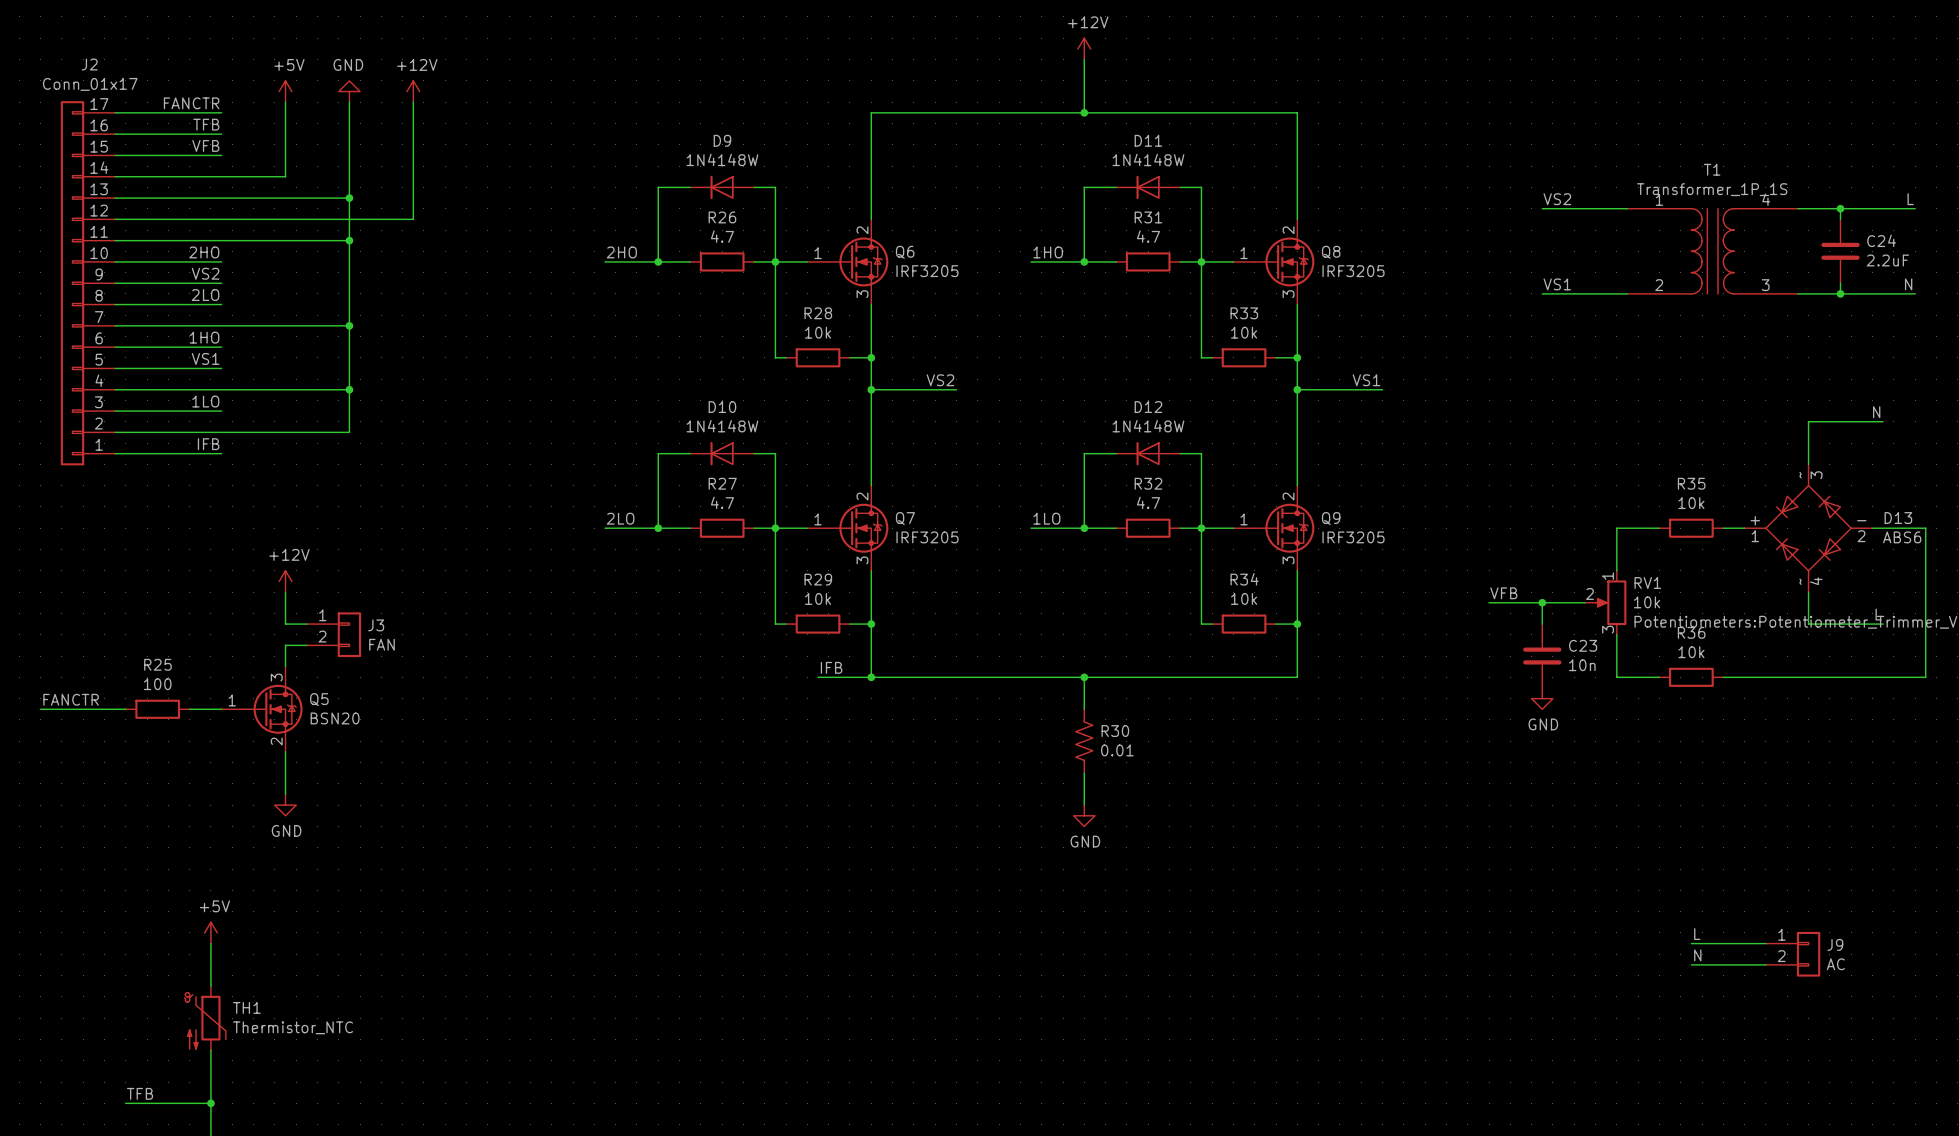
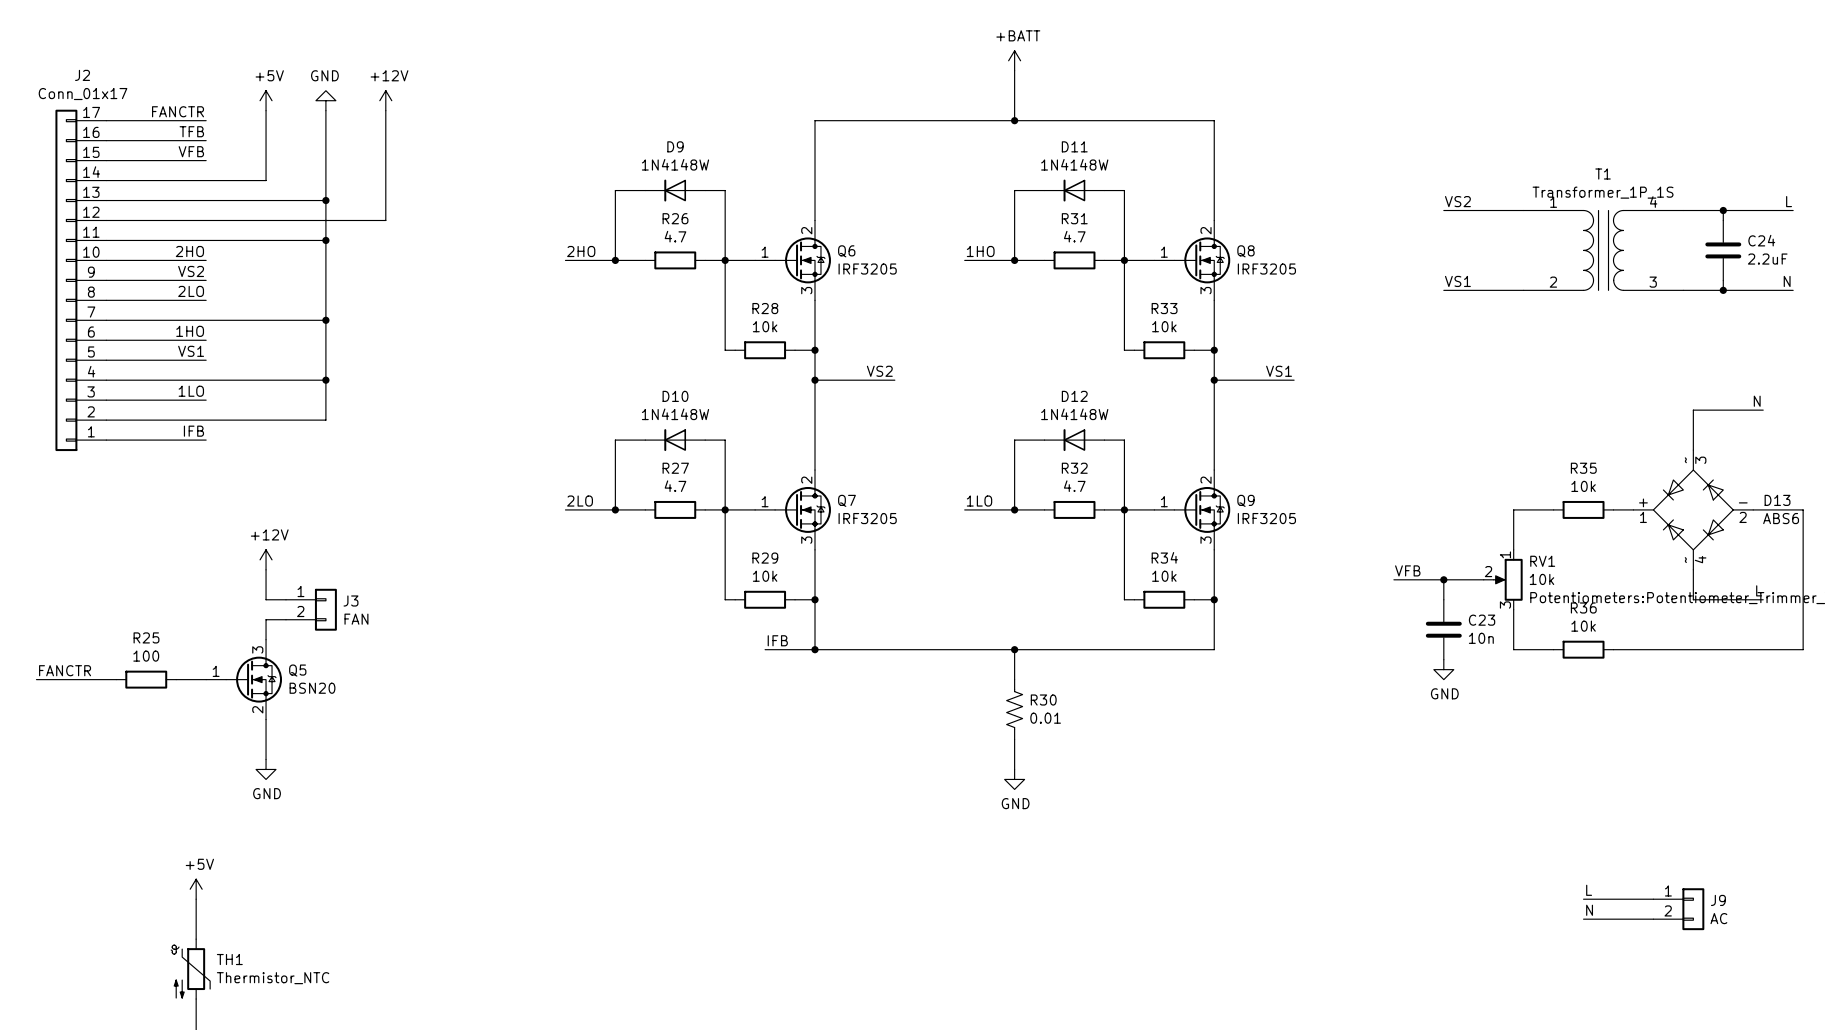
power symbol: +12V (1084, 48) -> +BATT (1014, 60)

